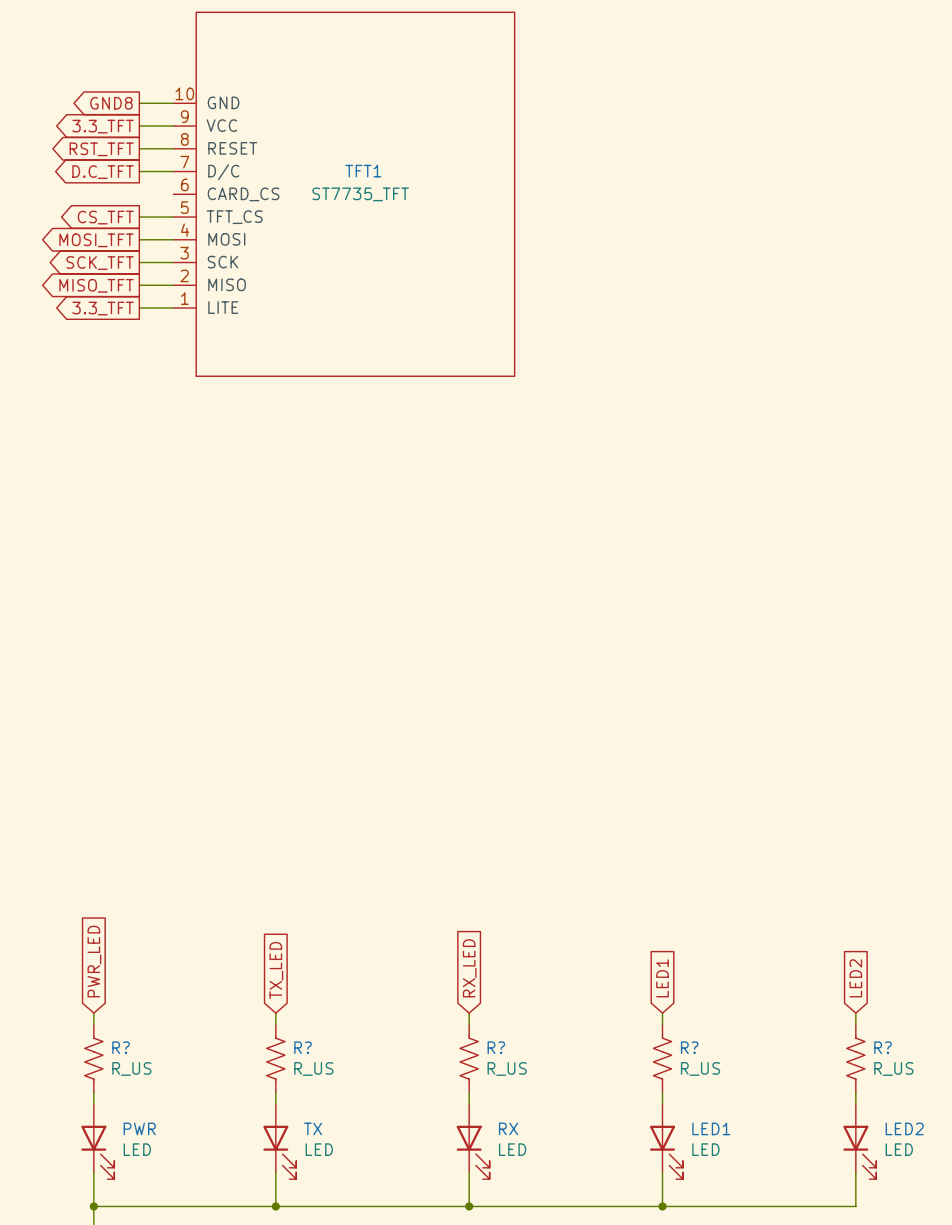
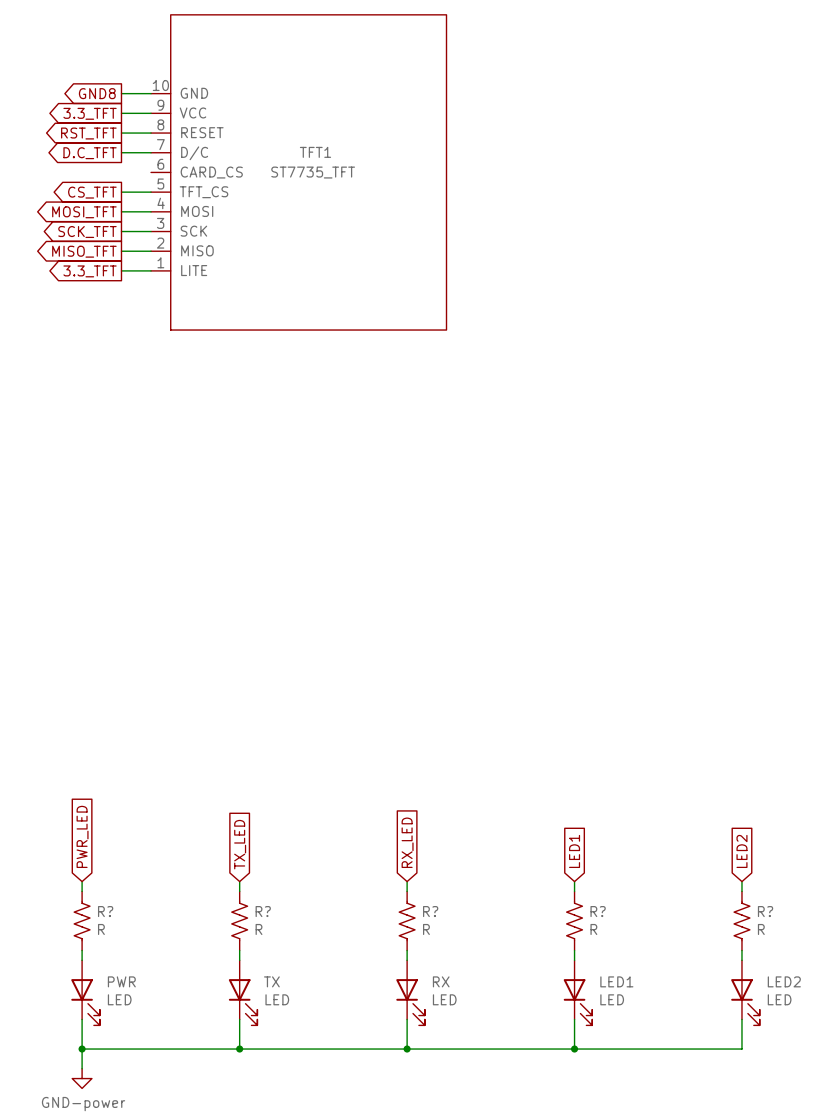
R? value: R_US (131, 1068) -> R (101, 929)
R? value: R_US (313, 1068) -> R (259, 929)
R? value: R_US (507, 1068) -> R (426, 929)
R? value: R_US (700, 1068) -> R (593, 929)
R? value: R_US (893, 1068) -> R (761, 929)

